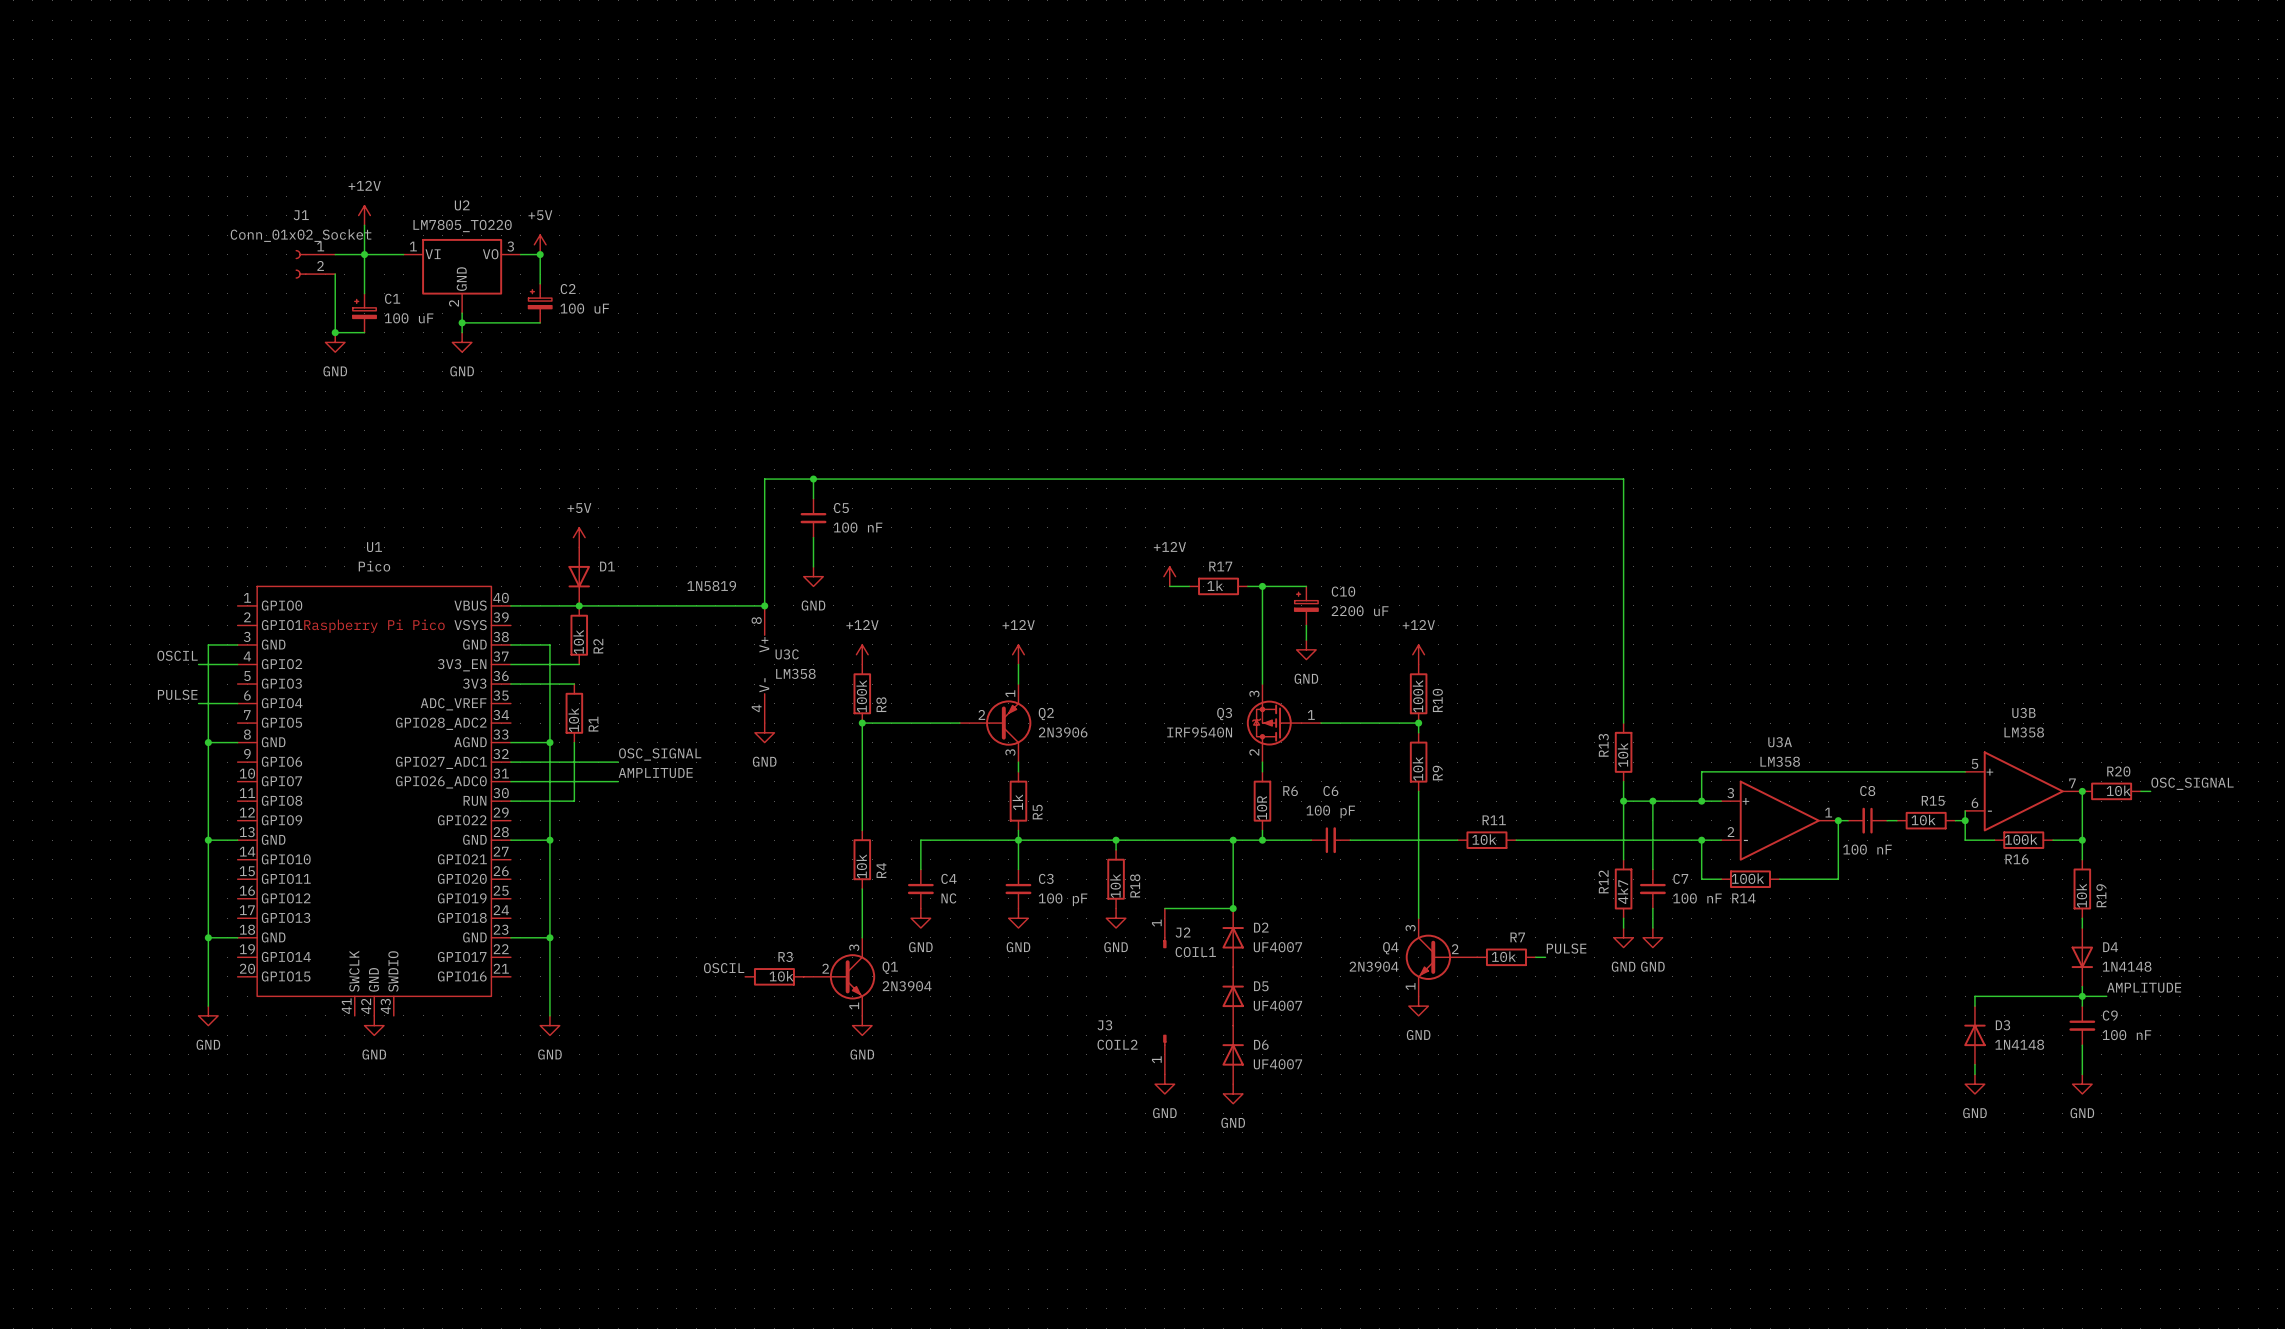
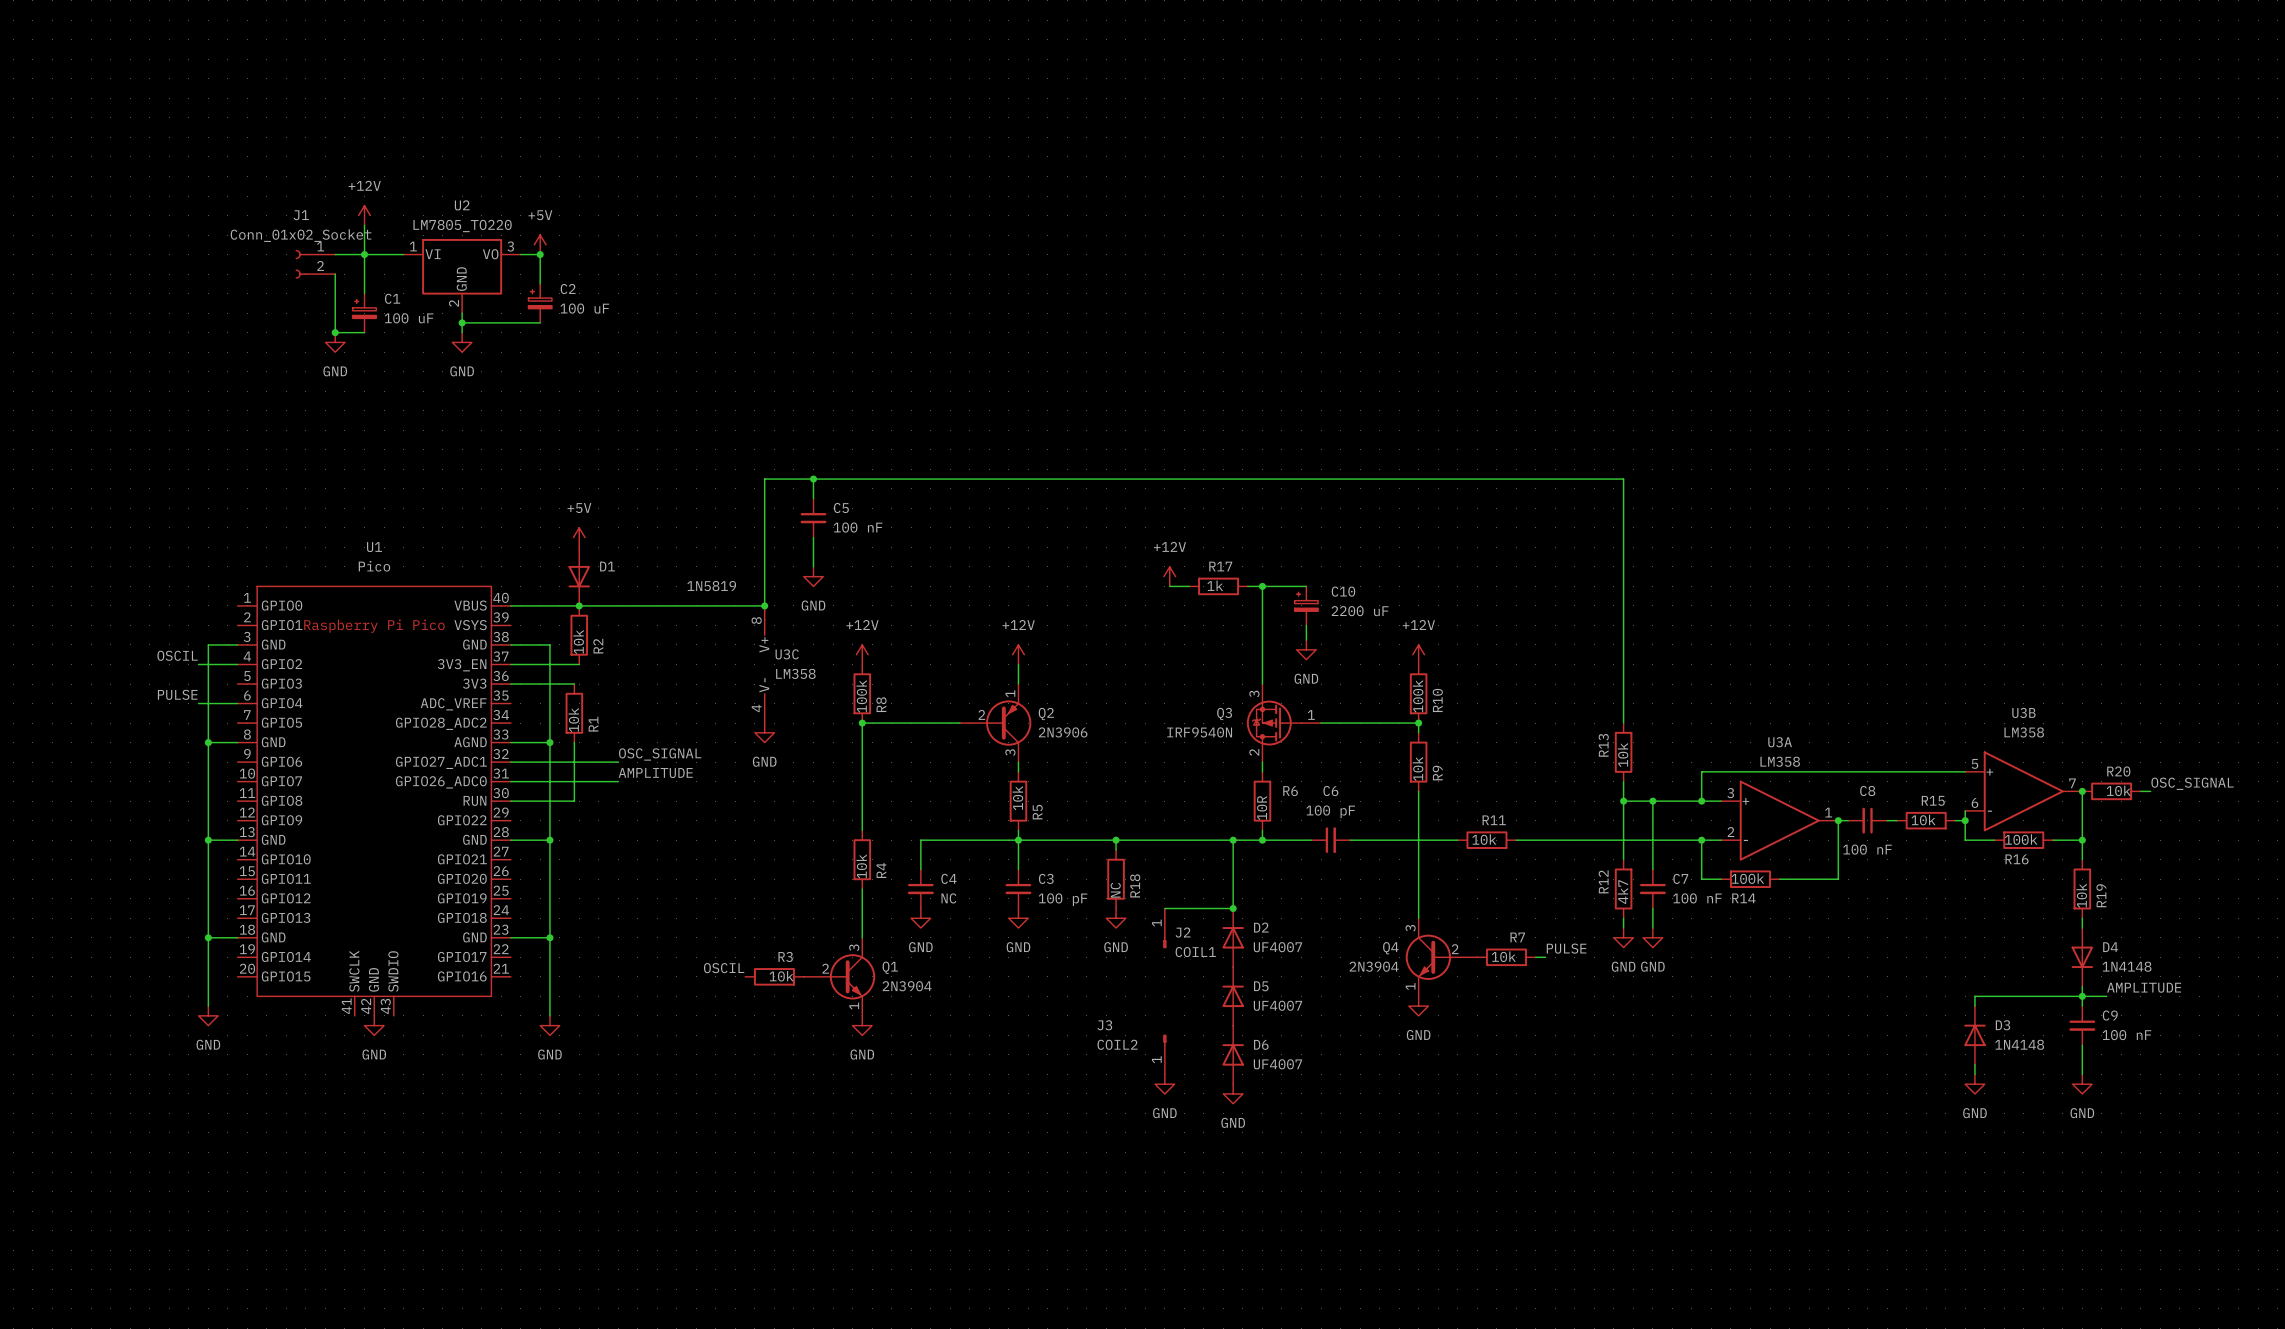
R5 value: 1k (1017, 802) -> 10k (1017, 798)
R18 value: 10k (1115, 885) -> NC (1115, 890)

